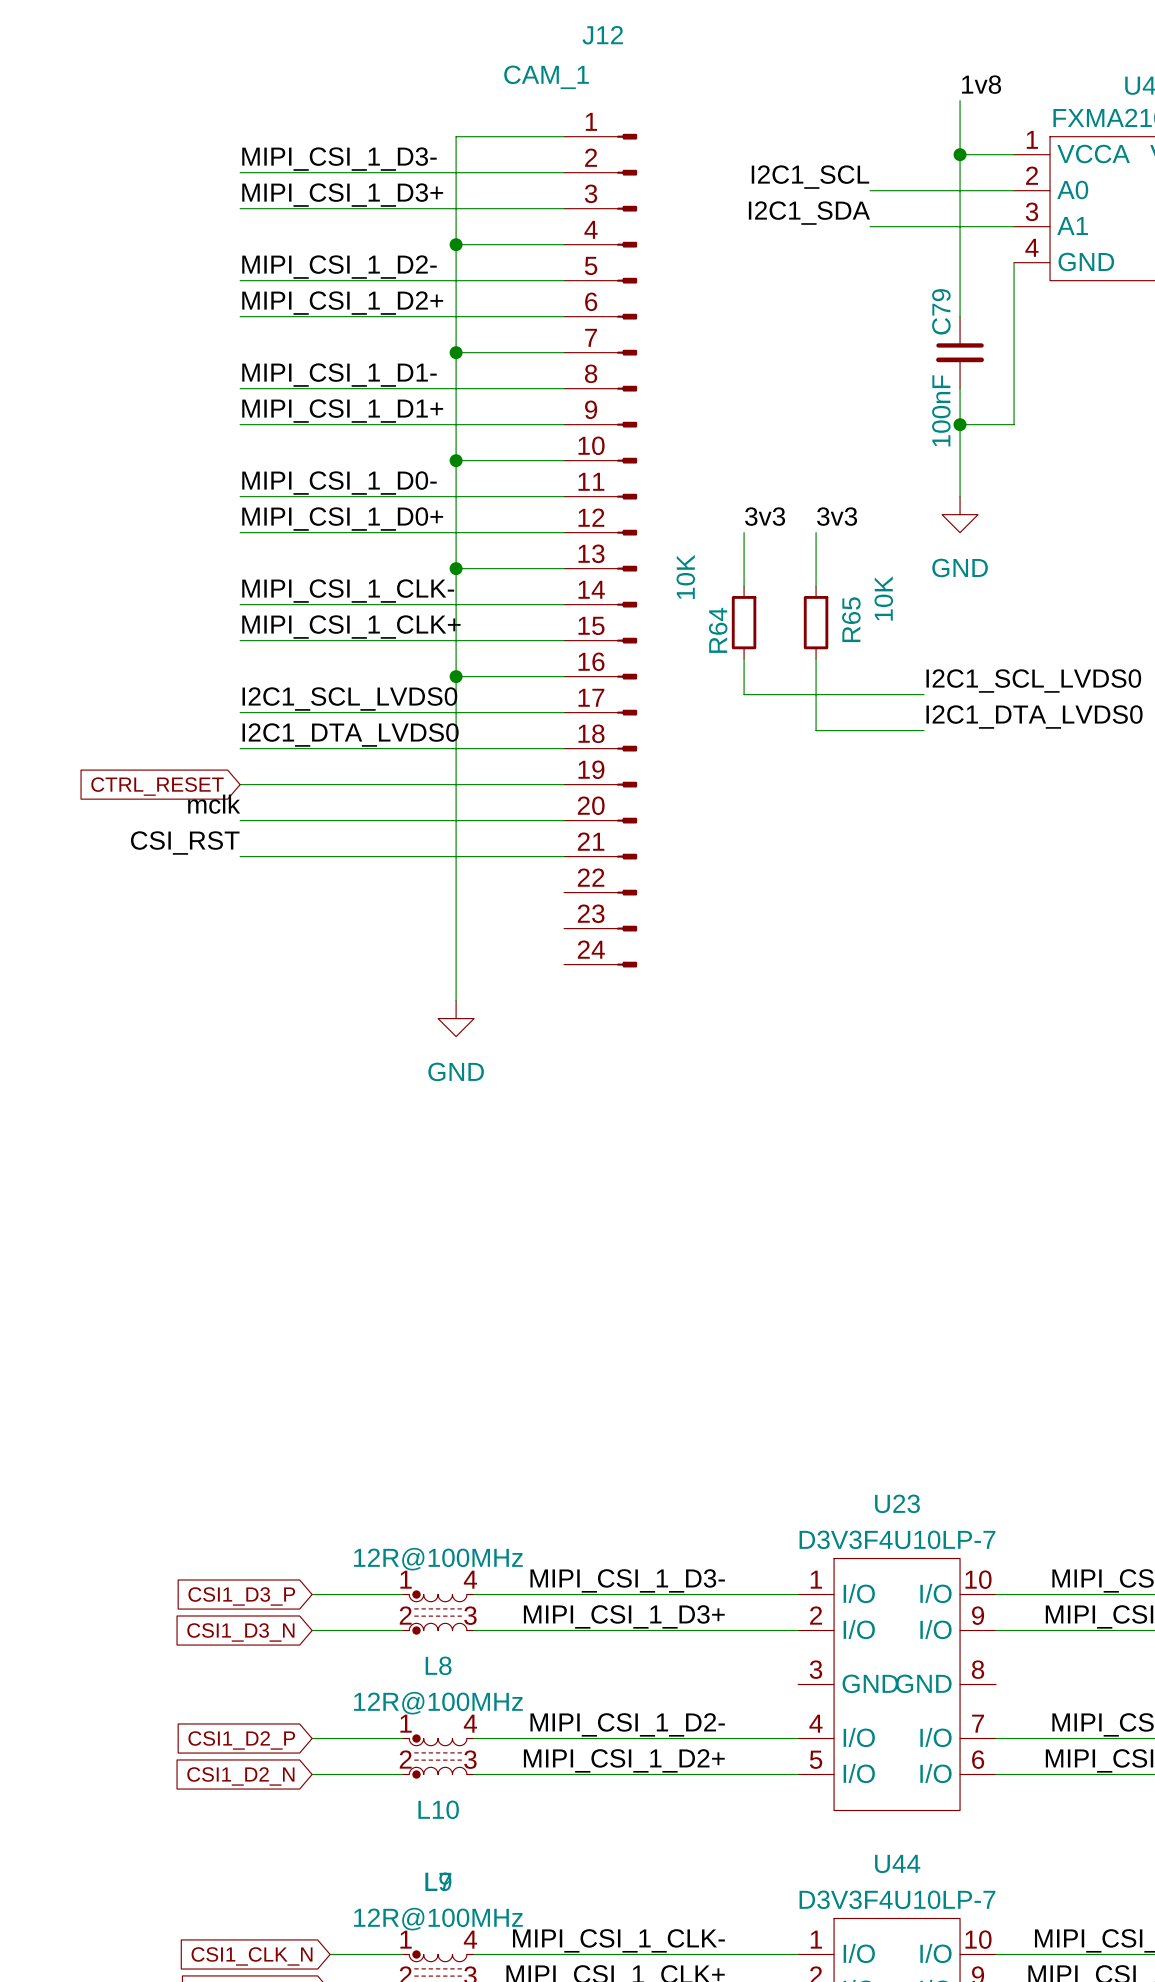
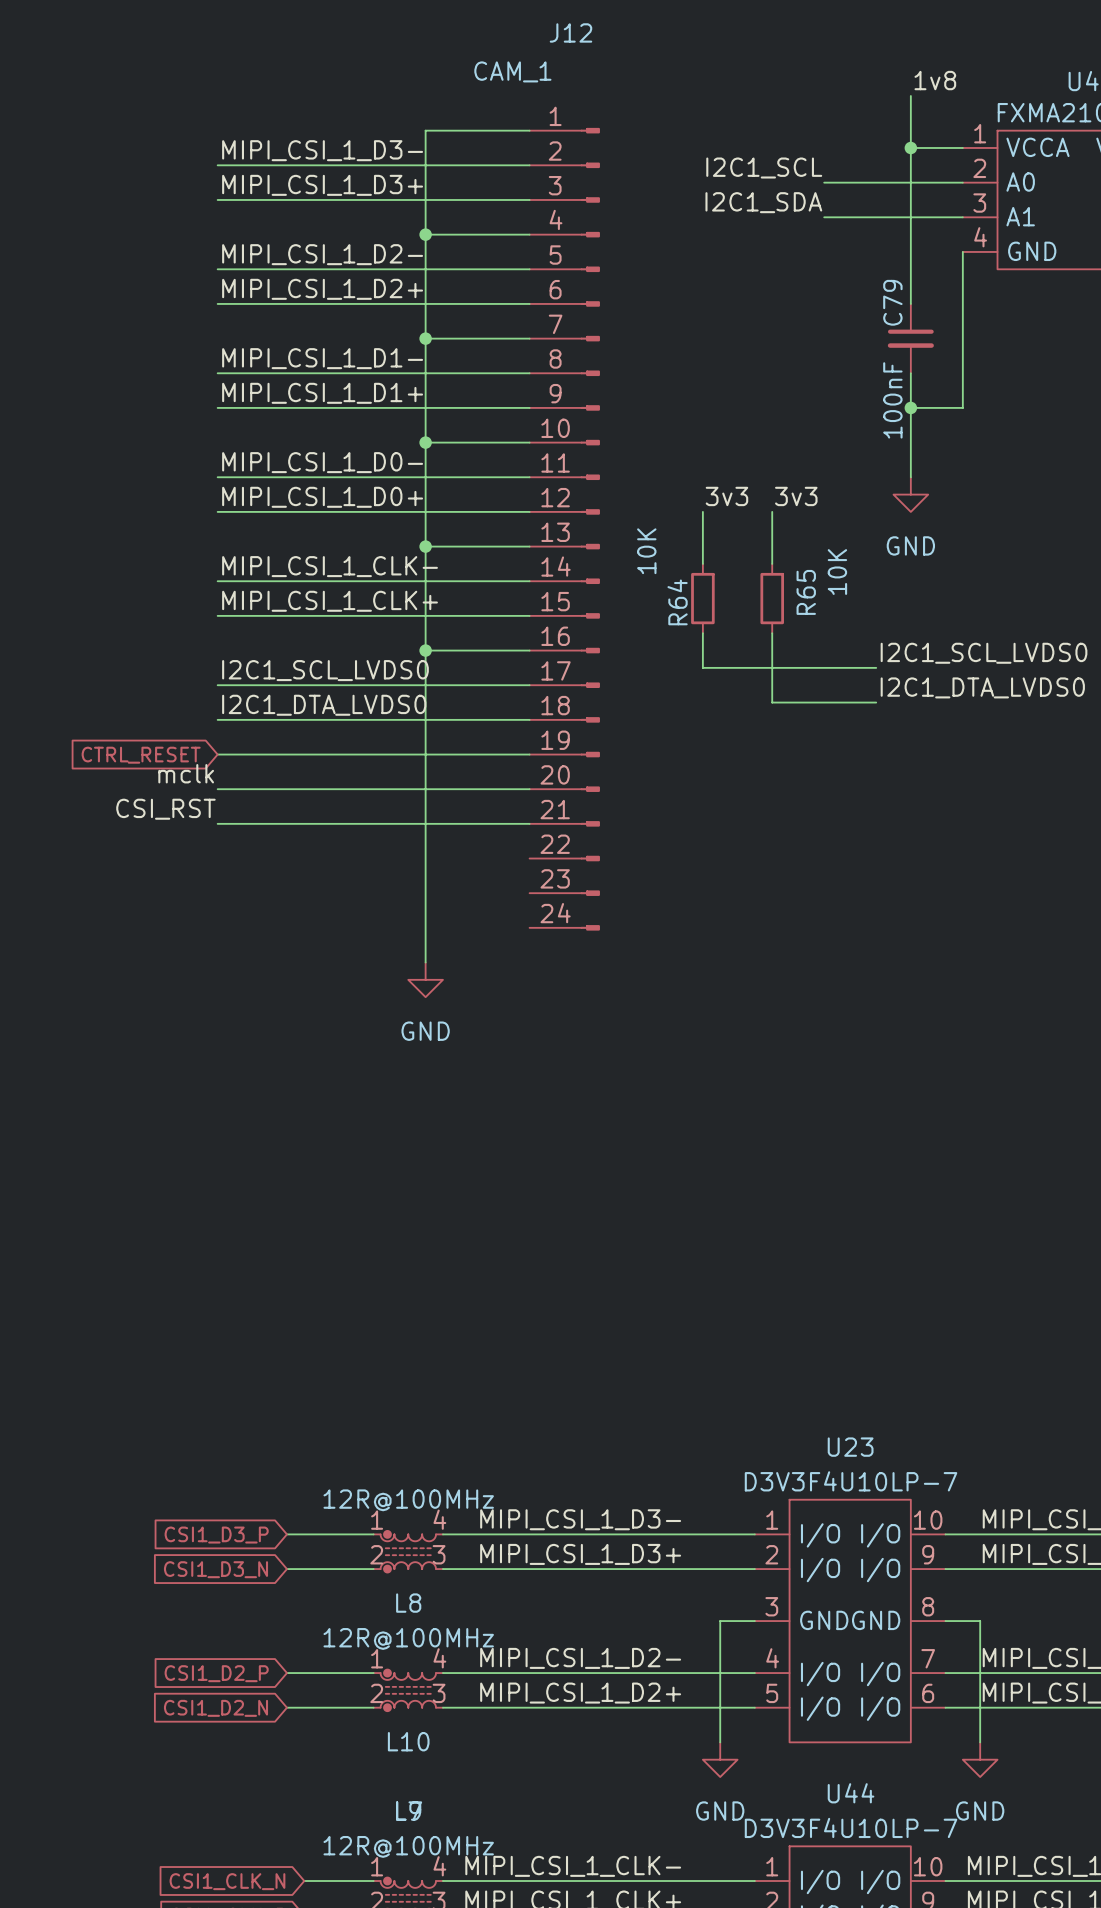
wire: none -> (754, 1621) (720, 1621) (720, 1742)
wire: none -> (945, 1621) (980, 1621) (980, 1742)
power symbol: none -> GND (720, 1759)
power symbol: none -> GND (980, 1759)

